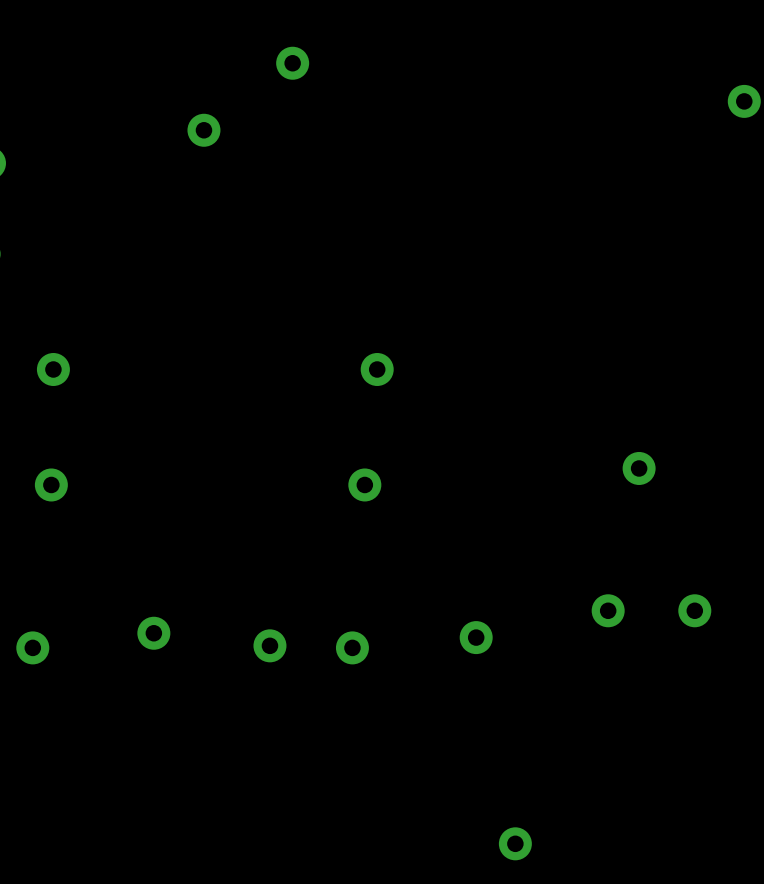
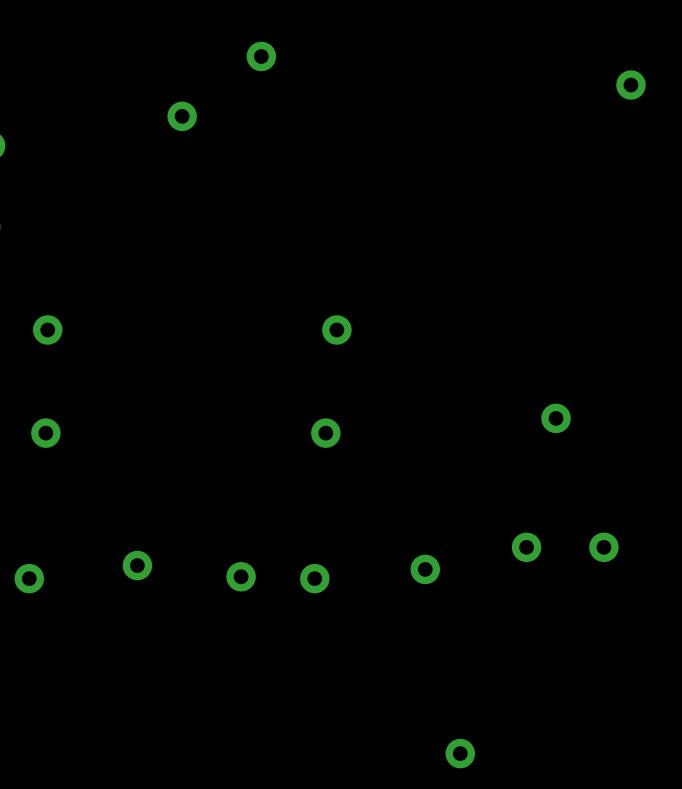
via position: (744, 101) -> (630, 85)
via position: (639, 468) -> (556, 418)
via position: (608, 610) -> (526, 547)
via position: (694, 610) -> (603, 547)

